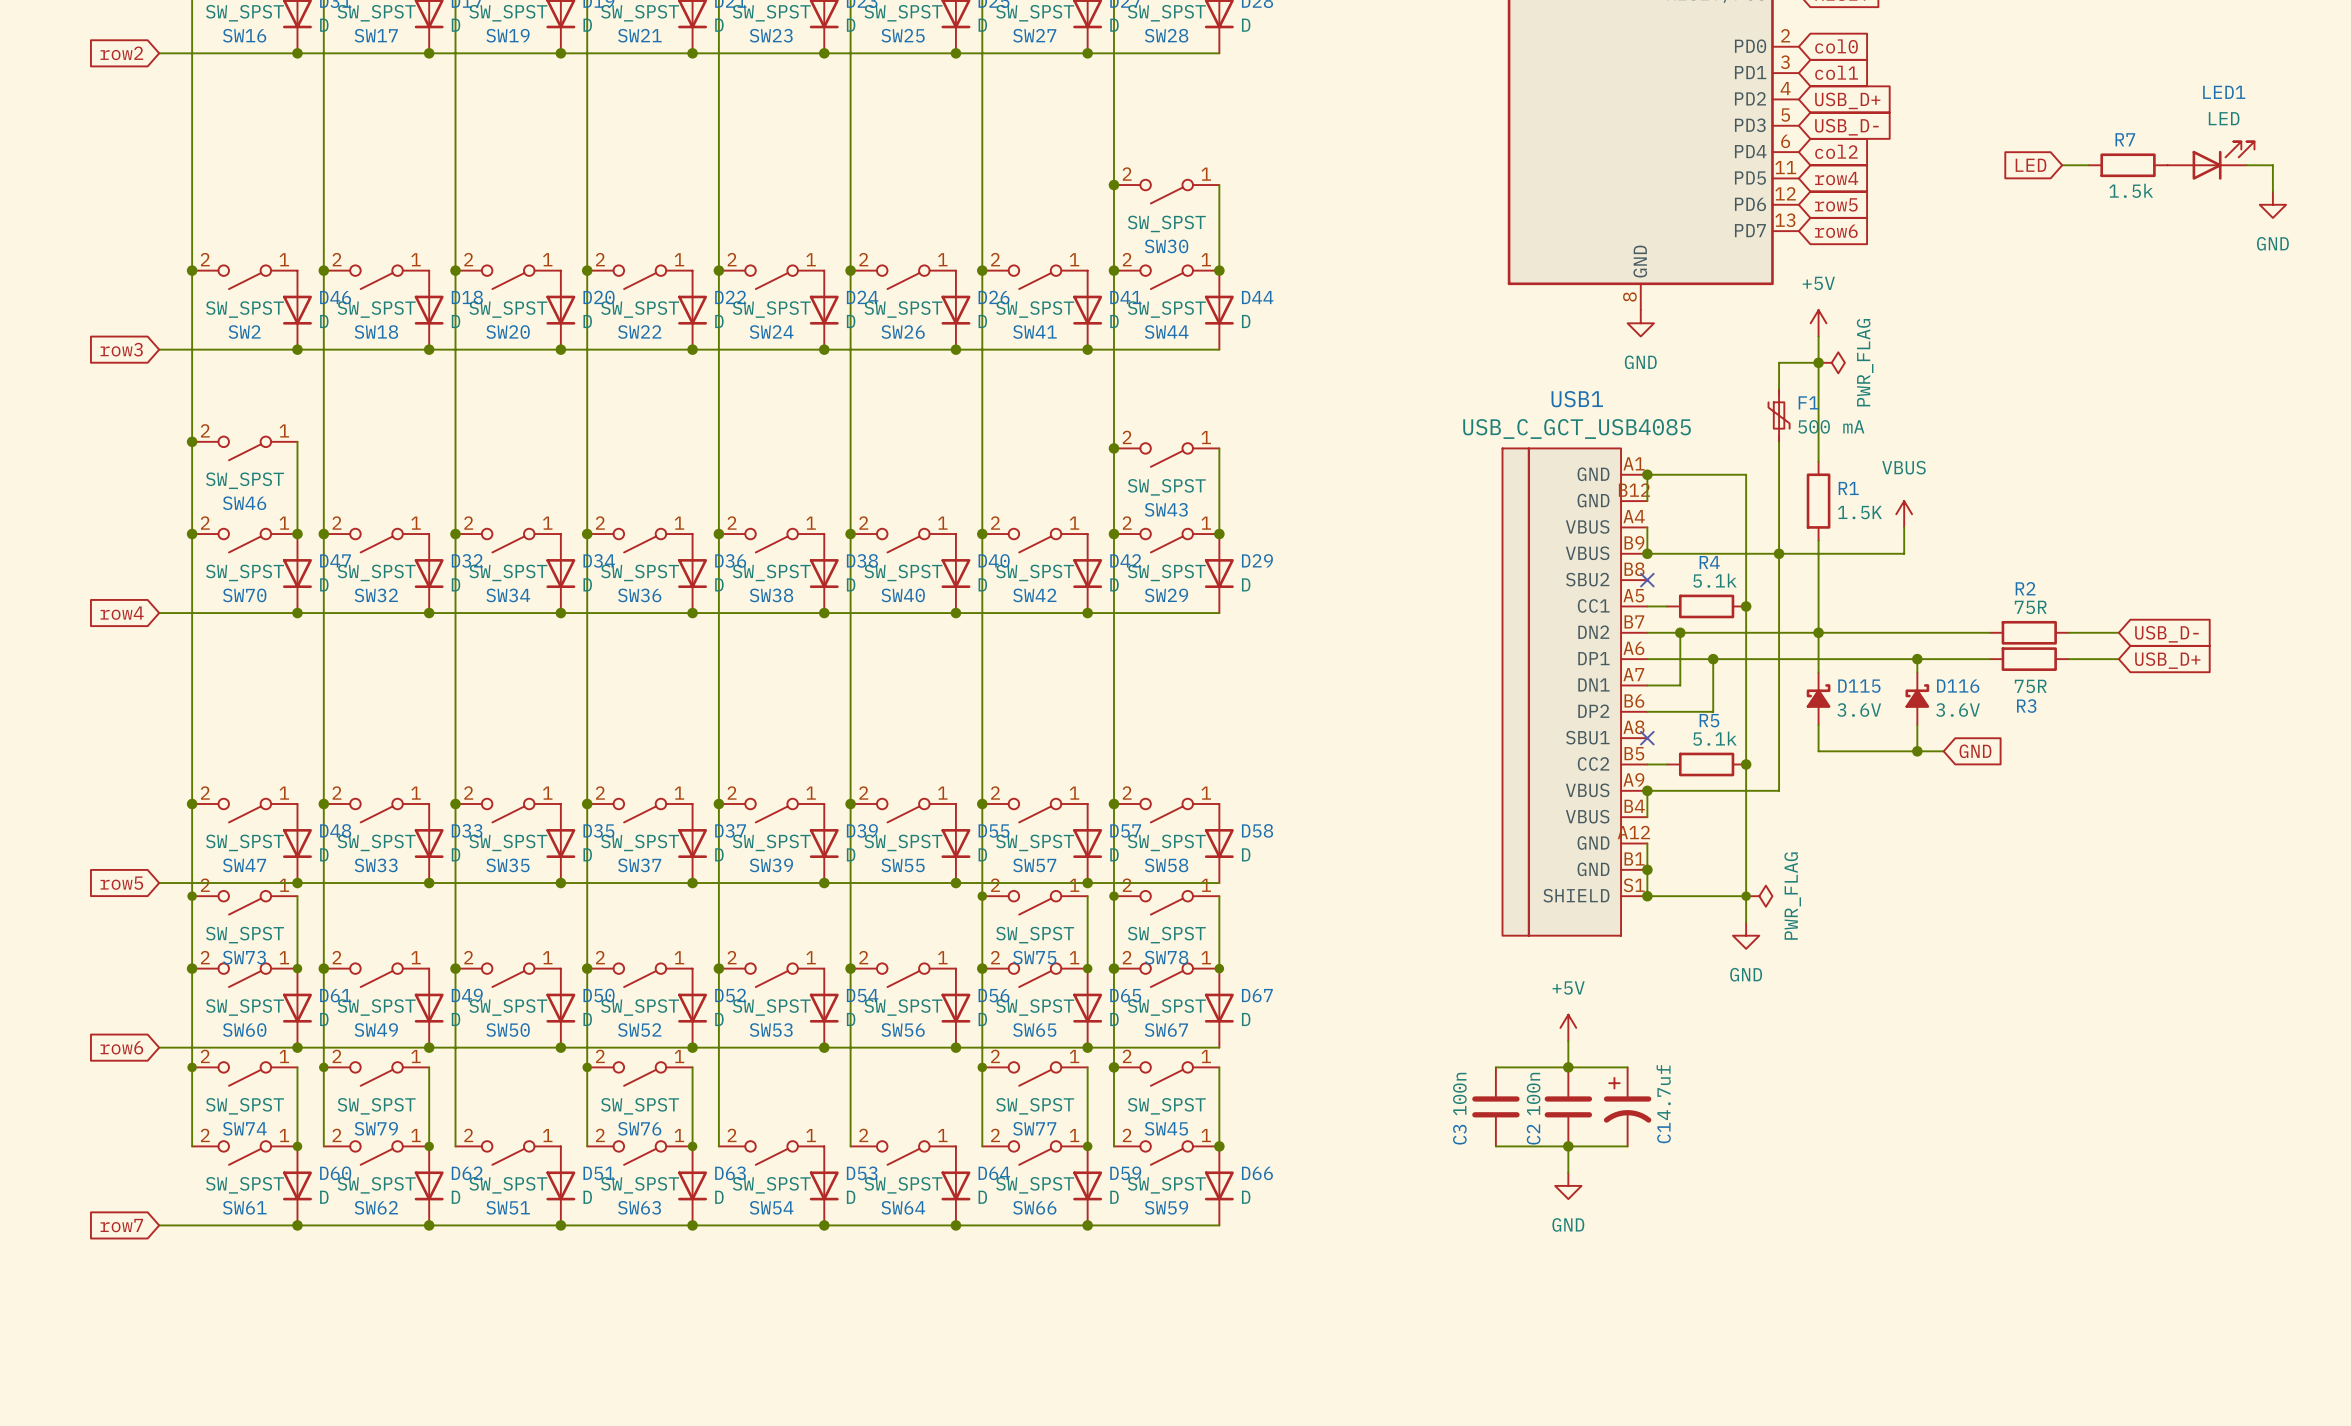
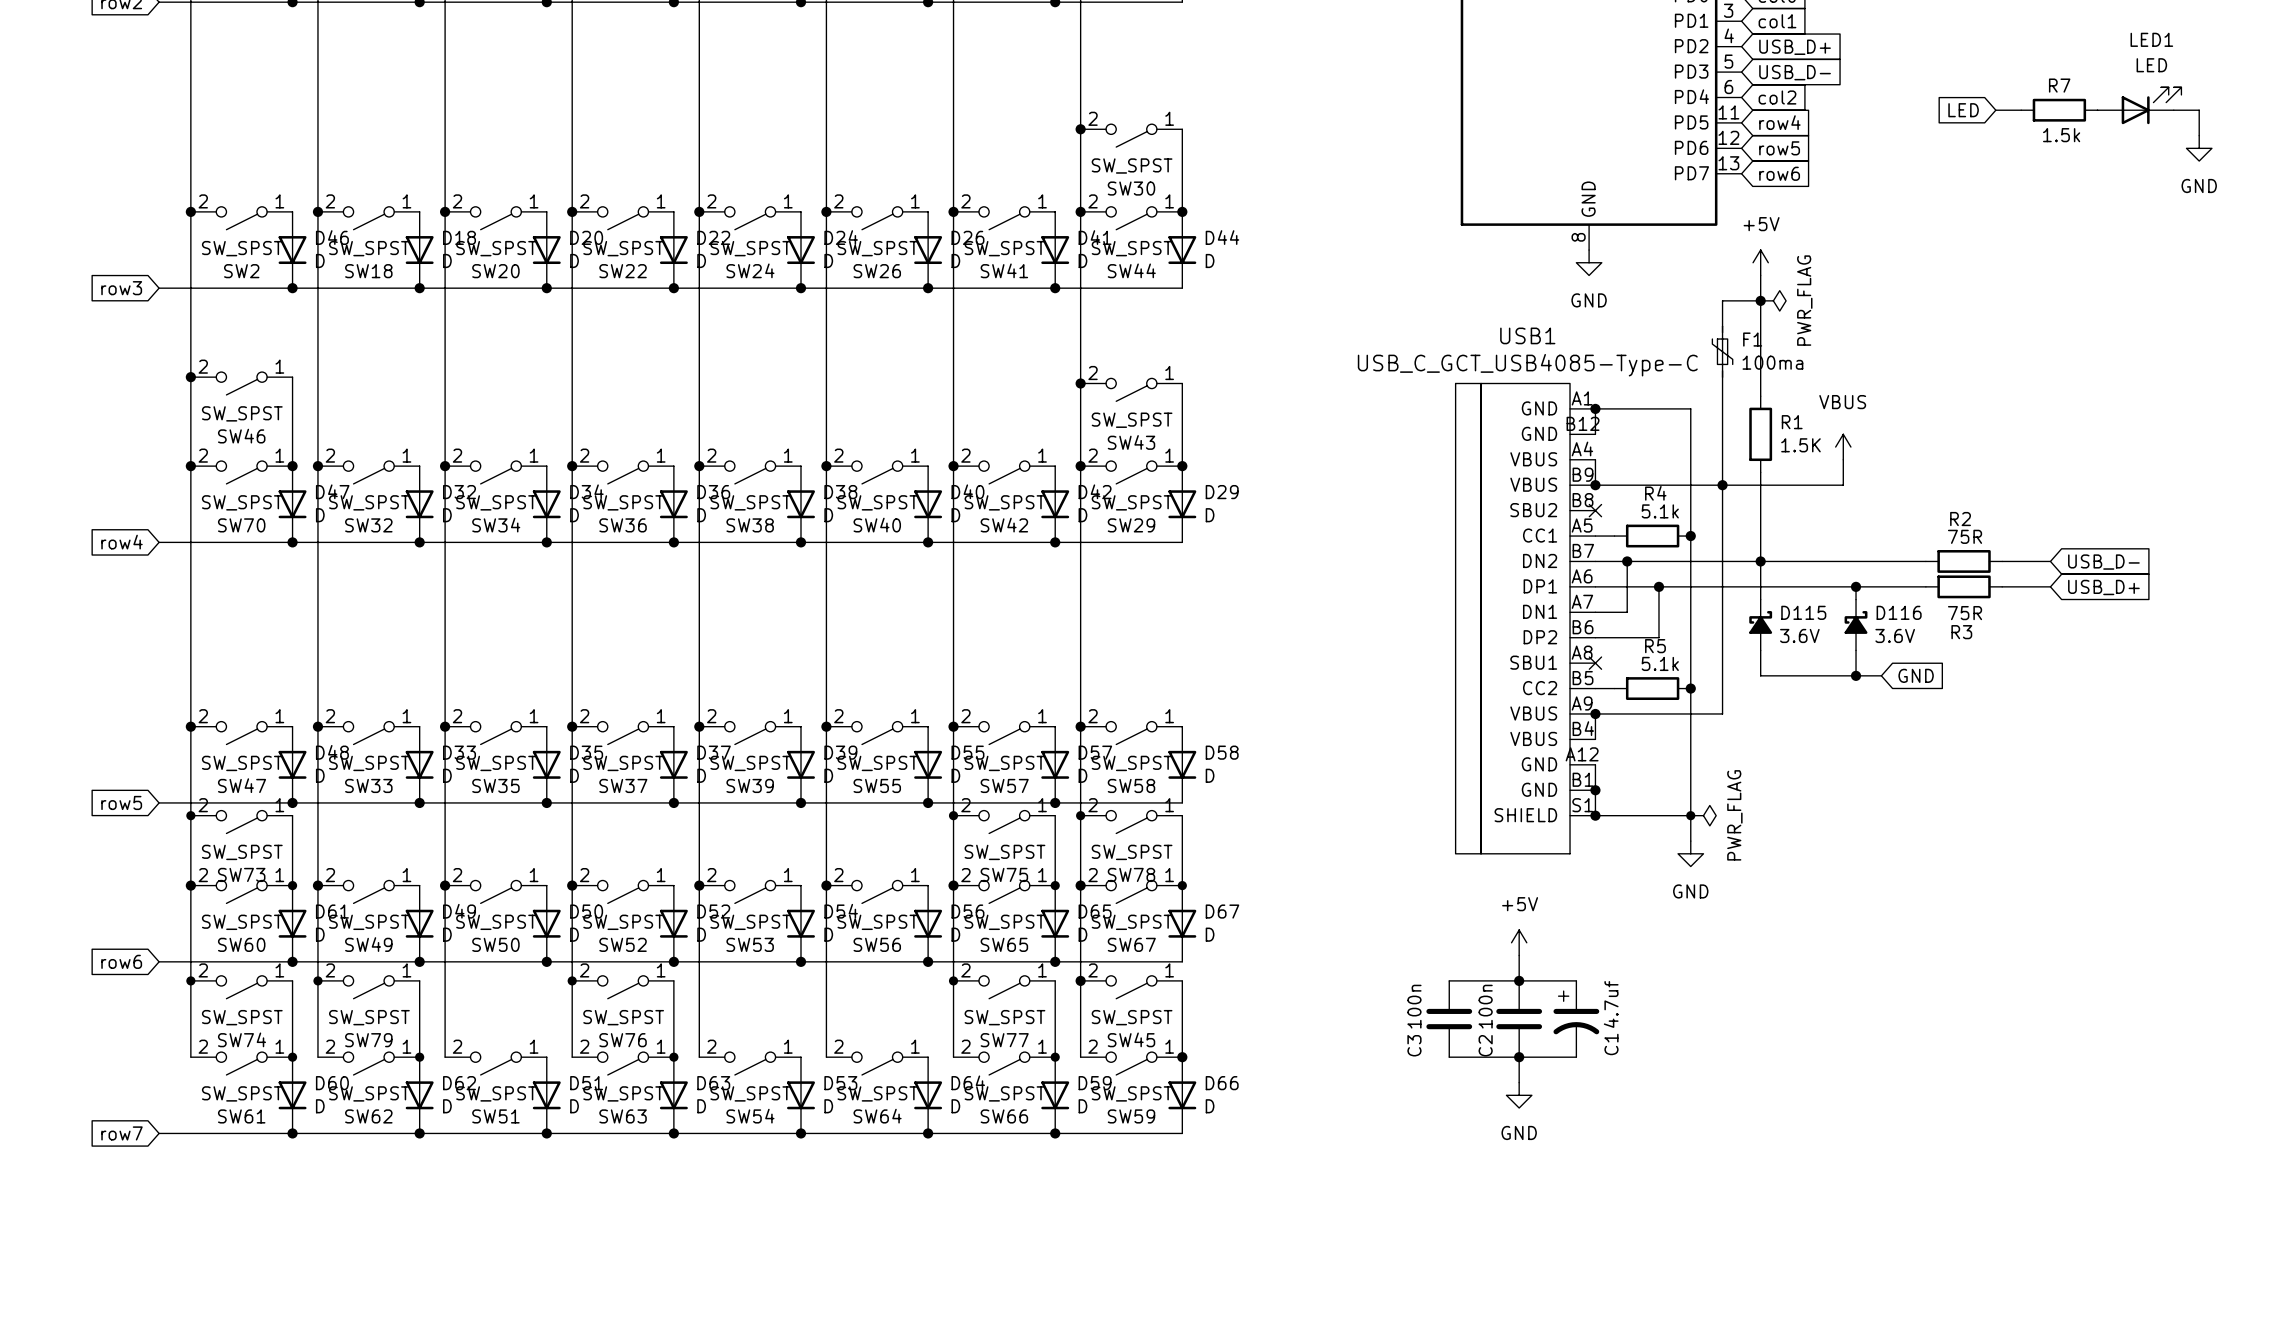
F1 value: 500 mA (1831, 426) -> 100ma (1772, 362)
USB1 value: USB_C_GCT_USB4085 (1577, 428) -> USB_C_GCT_USB4085-Type-C (1527, 365)

